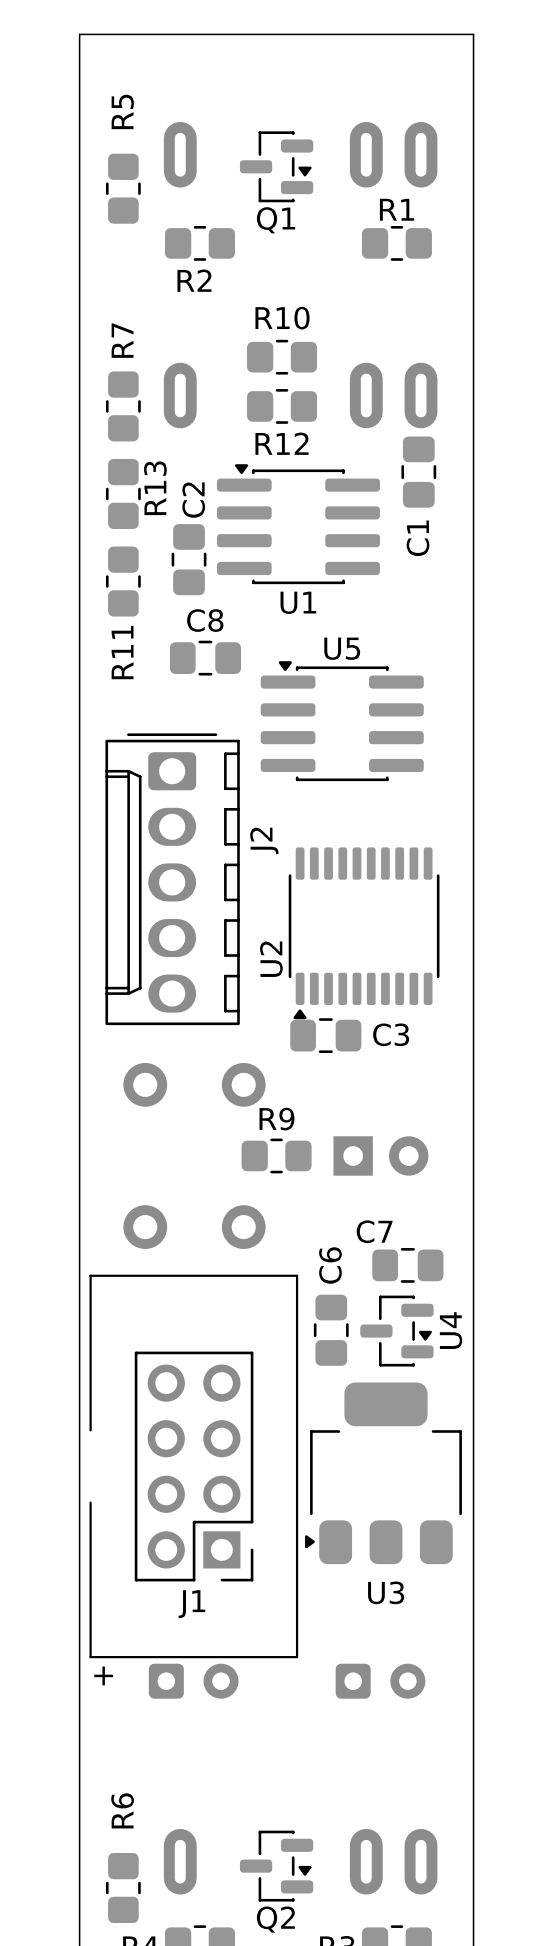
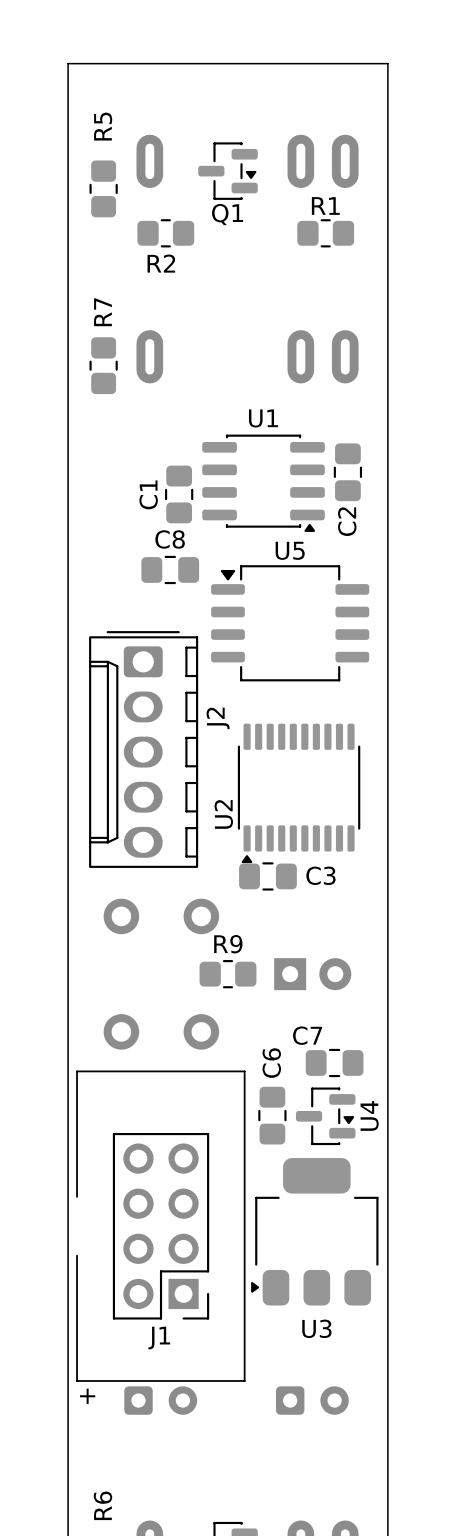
R10: (282, 357) -> none
R12: (282, 406) -> none
U1 footprint: [216, 464, 380, 585] -> [202, 434, 325, 532]
C1 position: (418, 472) -> (179, 494)
R13: (123, 493) -> none
C2 name position: C2 (193, 500) -> C2 (347, 521)
C1 name position: C1 (418, 538) -> C1 (148, 494)
C2 position: (189, 559) -> (347, 472)
R11: (123, 581) -> none
U1 name position: U1 (298, 602) -> U1 (263, 418)
U5 footprint: [260, 661, 424, 782] -> [211, 565, 370, 682]

